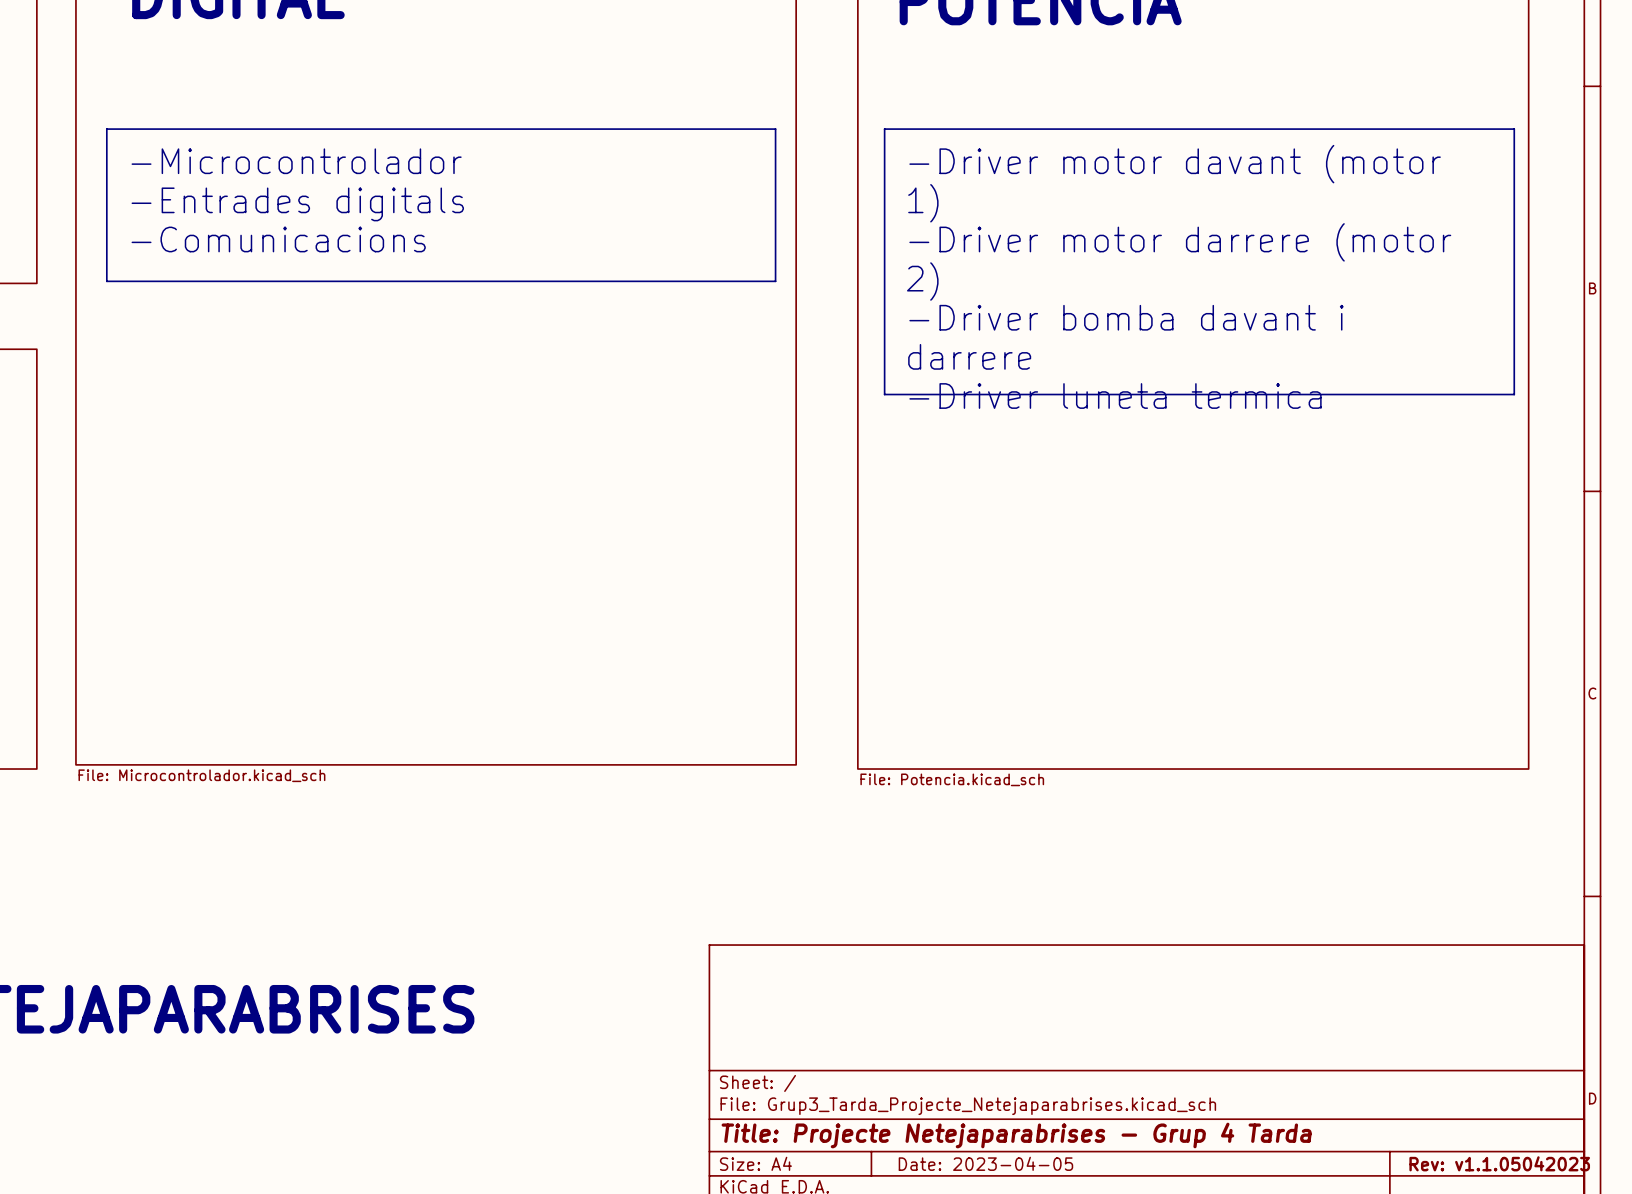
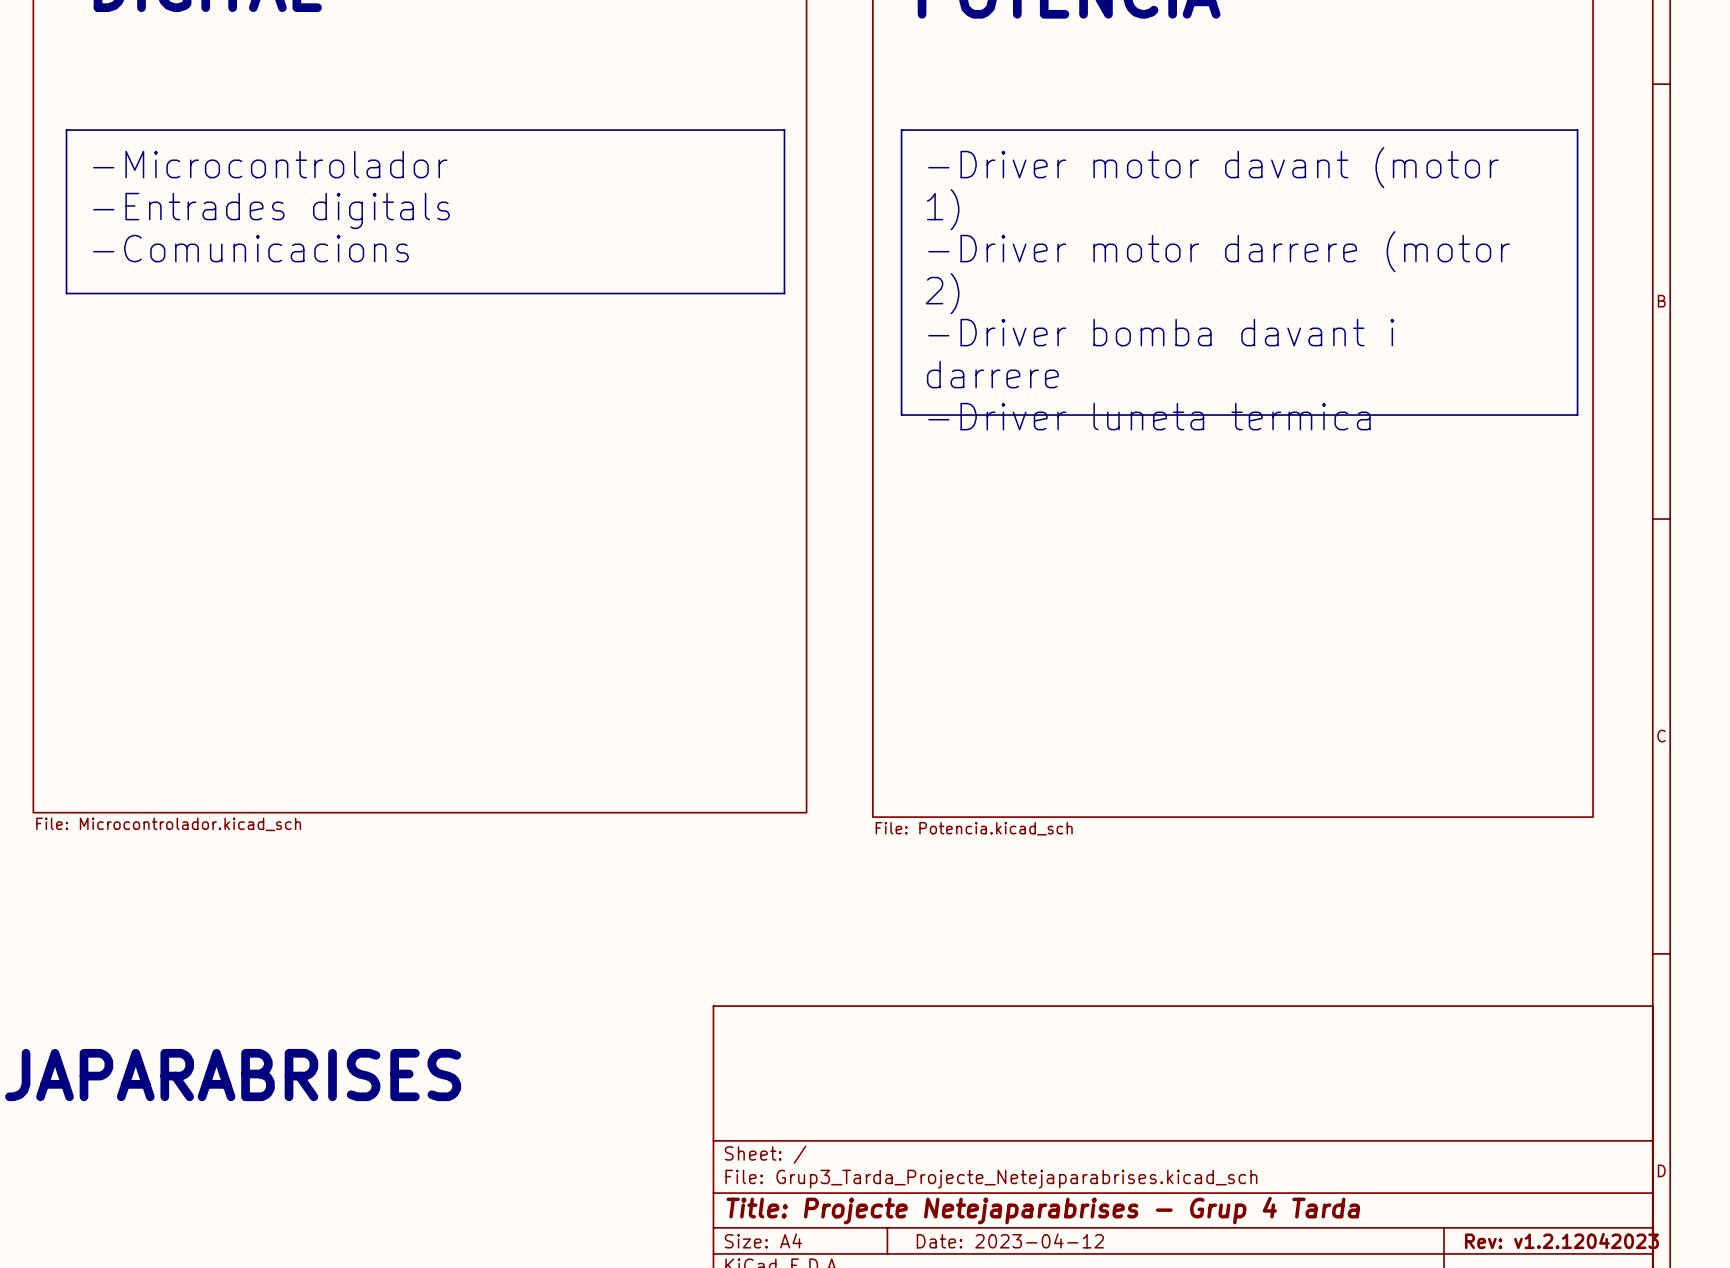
title block: Date: 2023-04-05 (985, 1163) -> Date: 2023-04-12 (1010, 1240)
title block: Rev: v1.1.05042023 (1499, 1163) -> Rev: v1.2.12042023 (1561, 1240)

